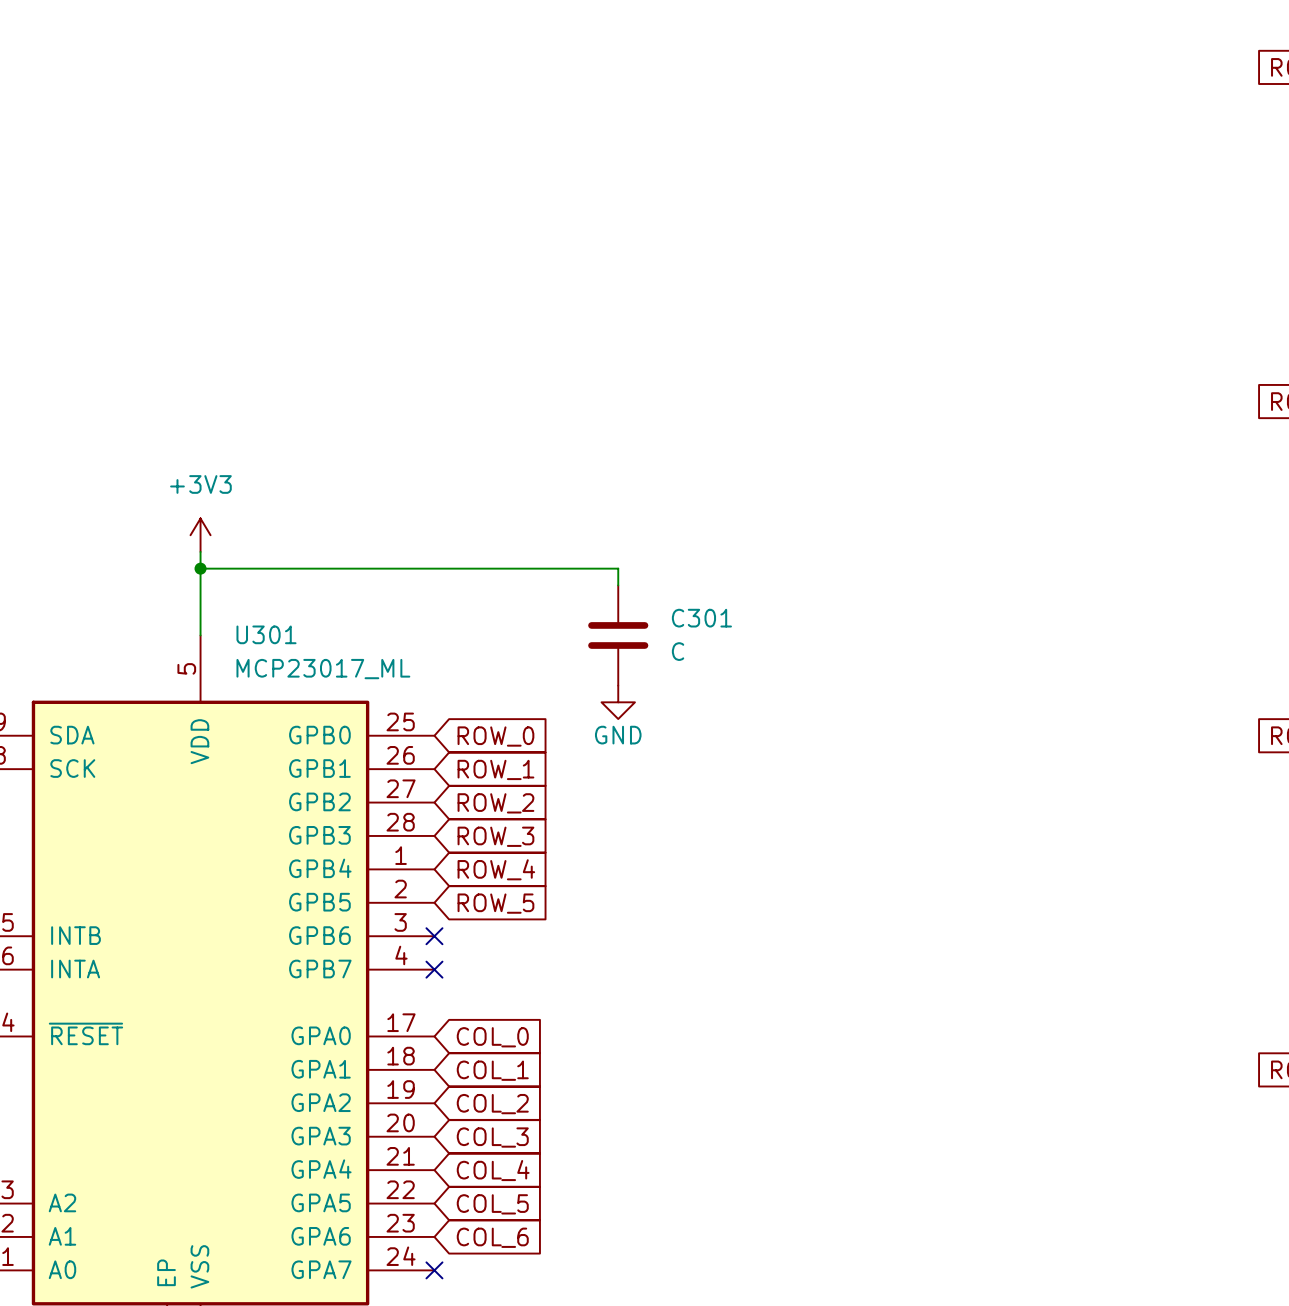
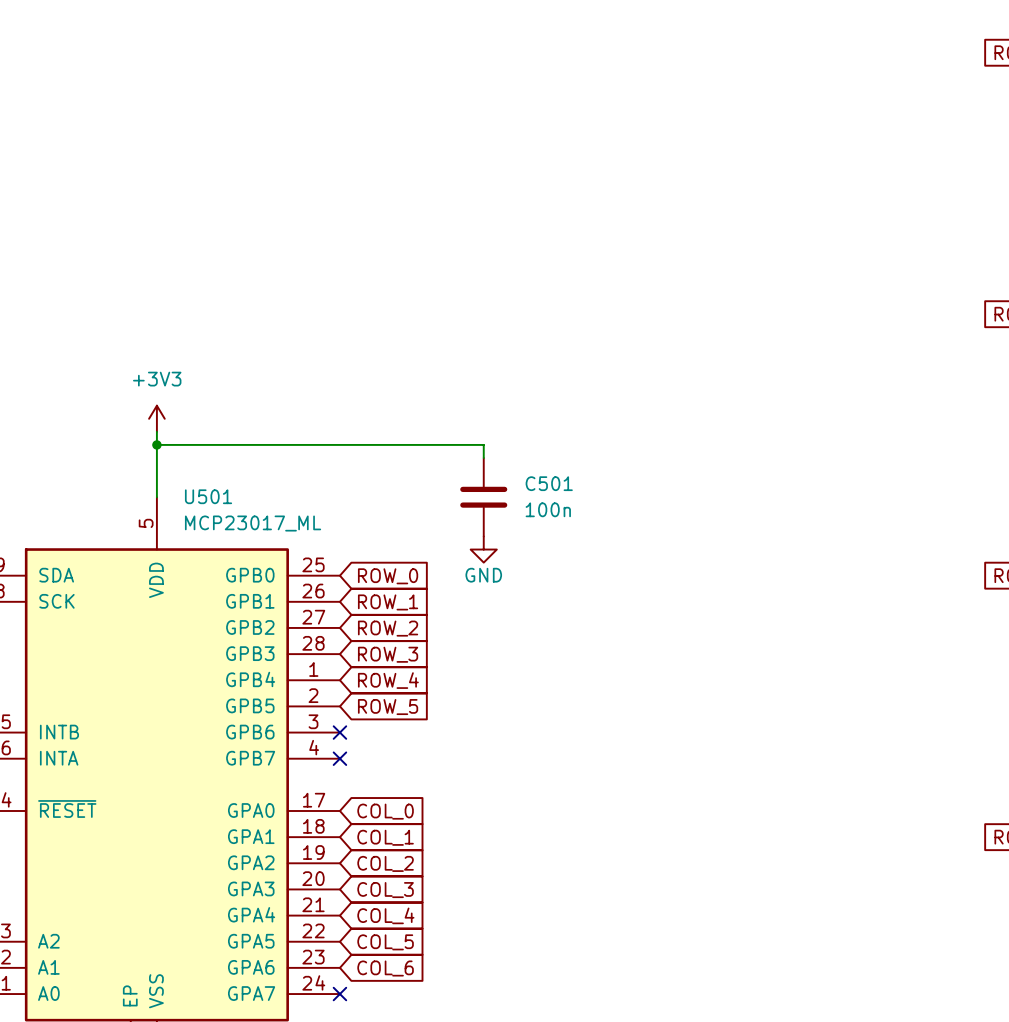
C301 name: C301 (701, 618) -> C501 (549, 483)
U301 name: U301 (266, 634) -> U501 (208, 496)
C301 value: C (678, 651) -> 100n (548, 509)

